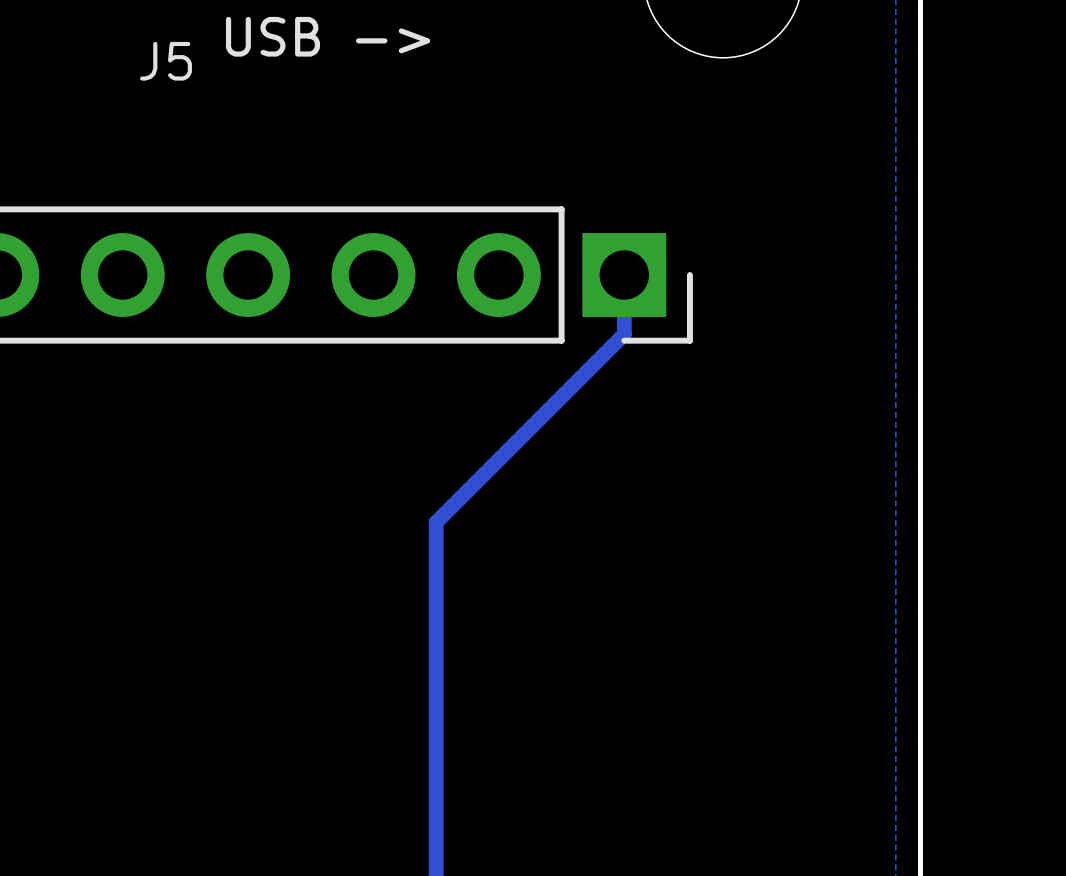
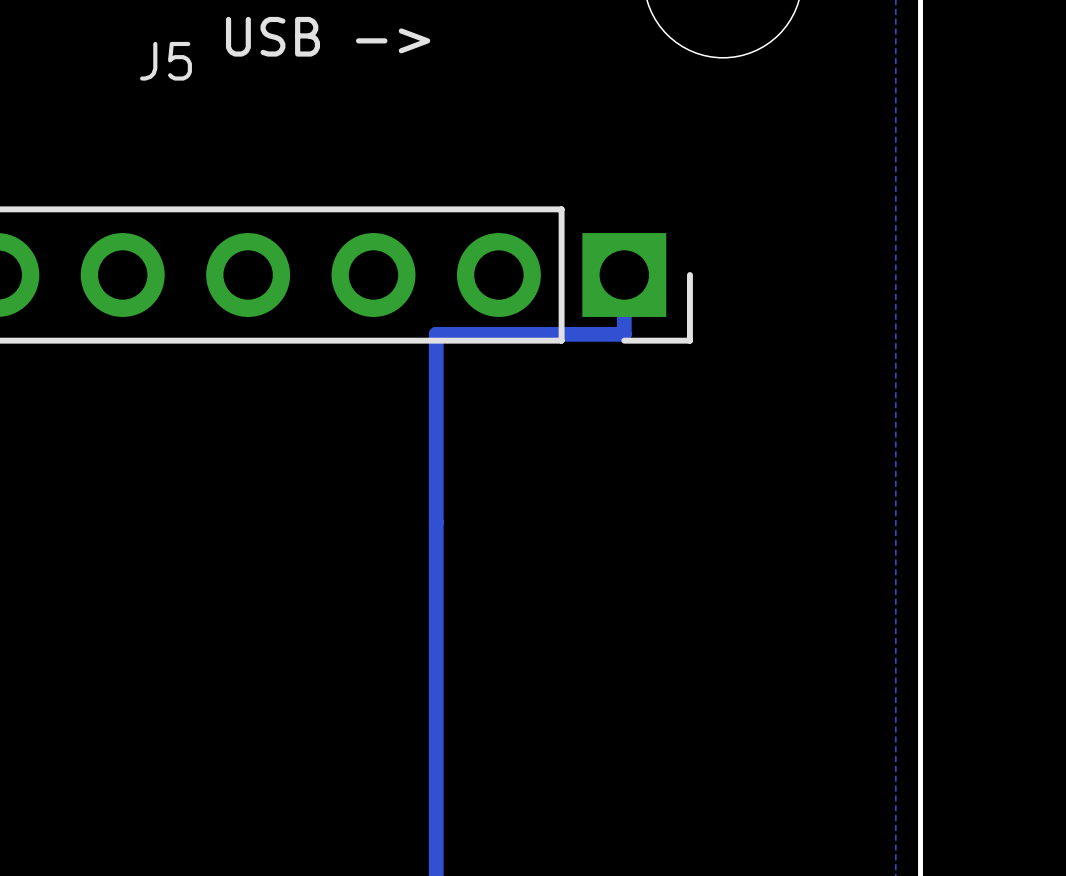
bottom track: (624, 334) (436, 522) -> (624, 334) (436, 334) (436, 522)

